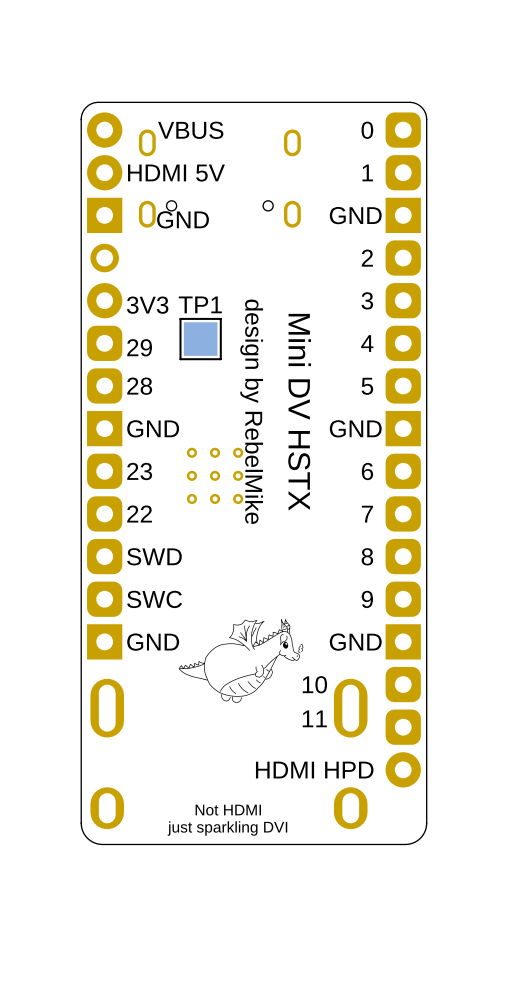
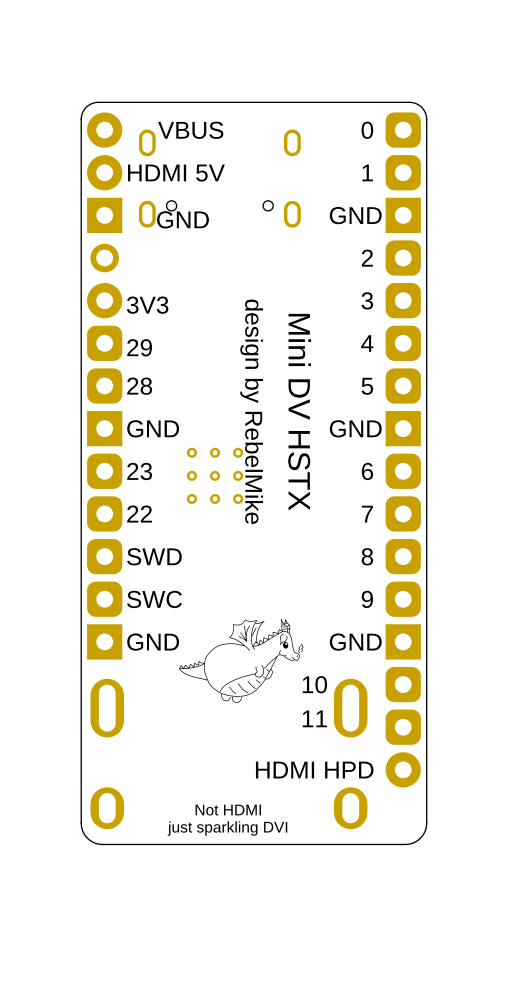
TP1: (200, 339) -> none

